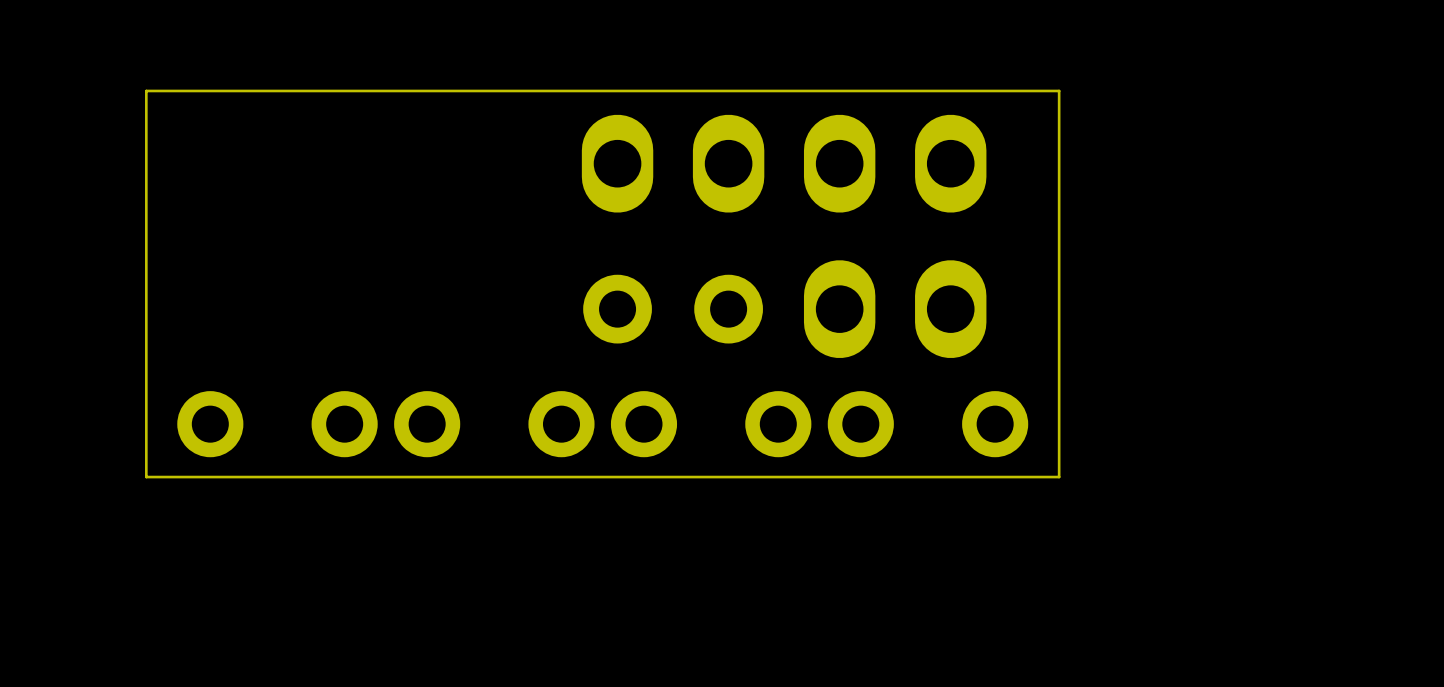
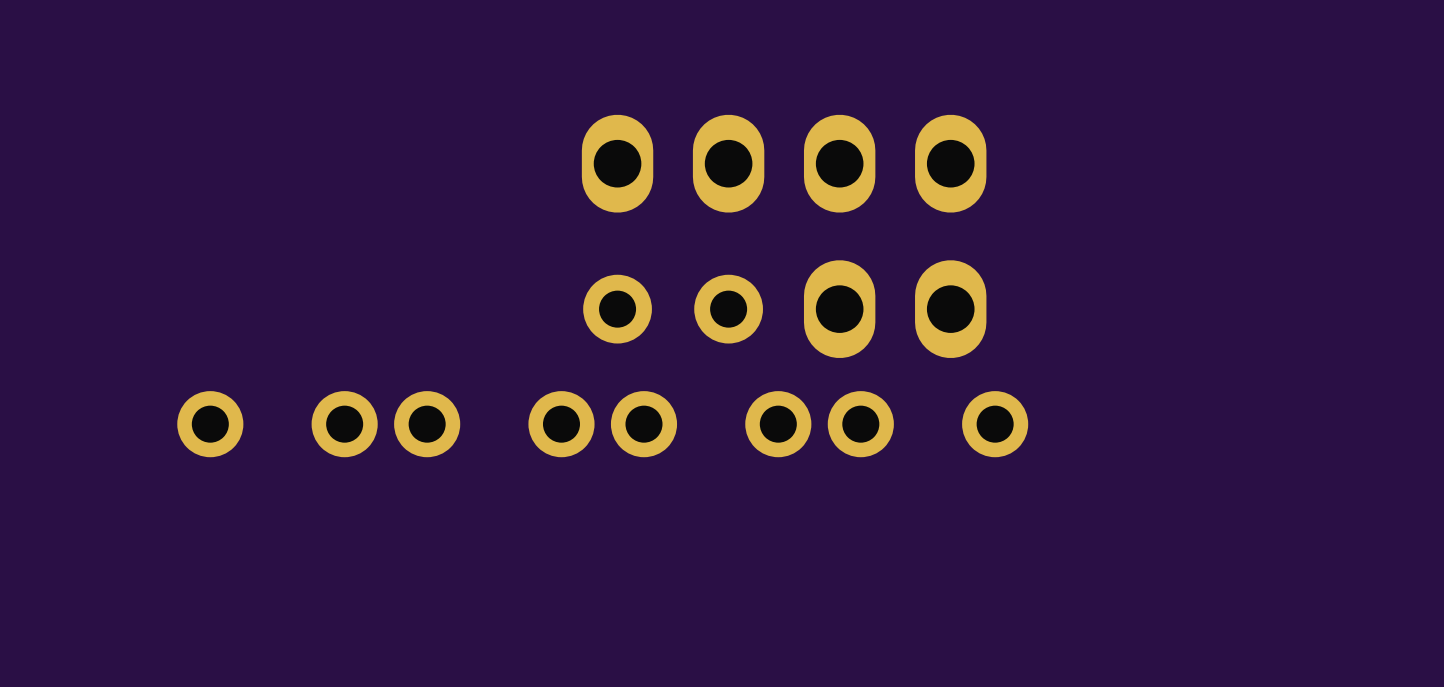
board edge: (1059, 90) (146, 90) (146, 477) (1059, 477) (1059, 90) -> none

